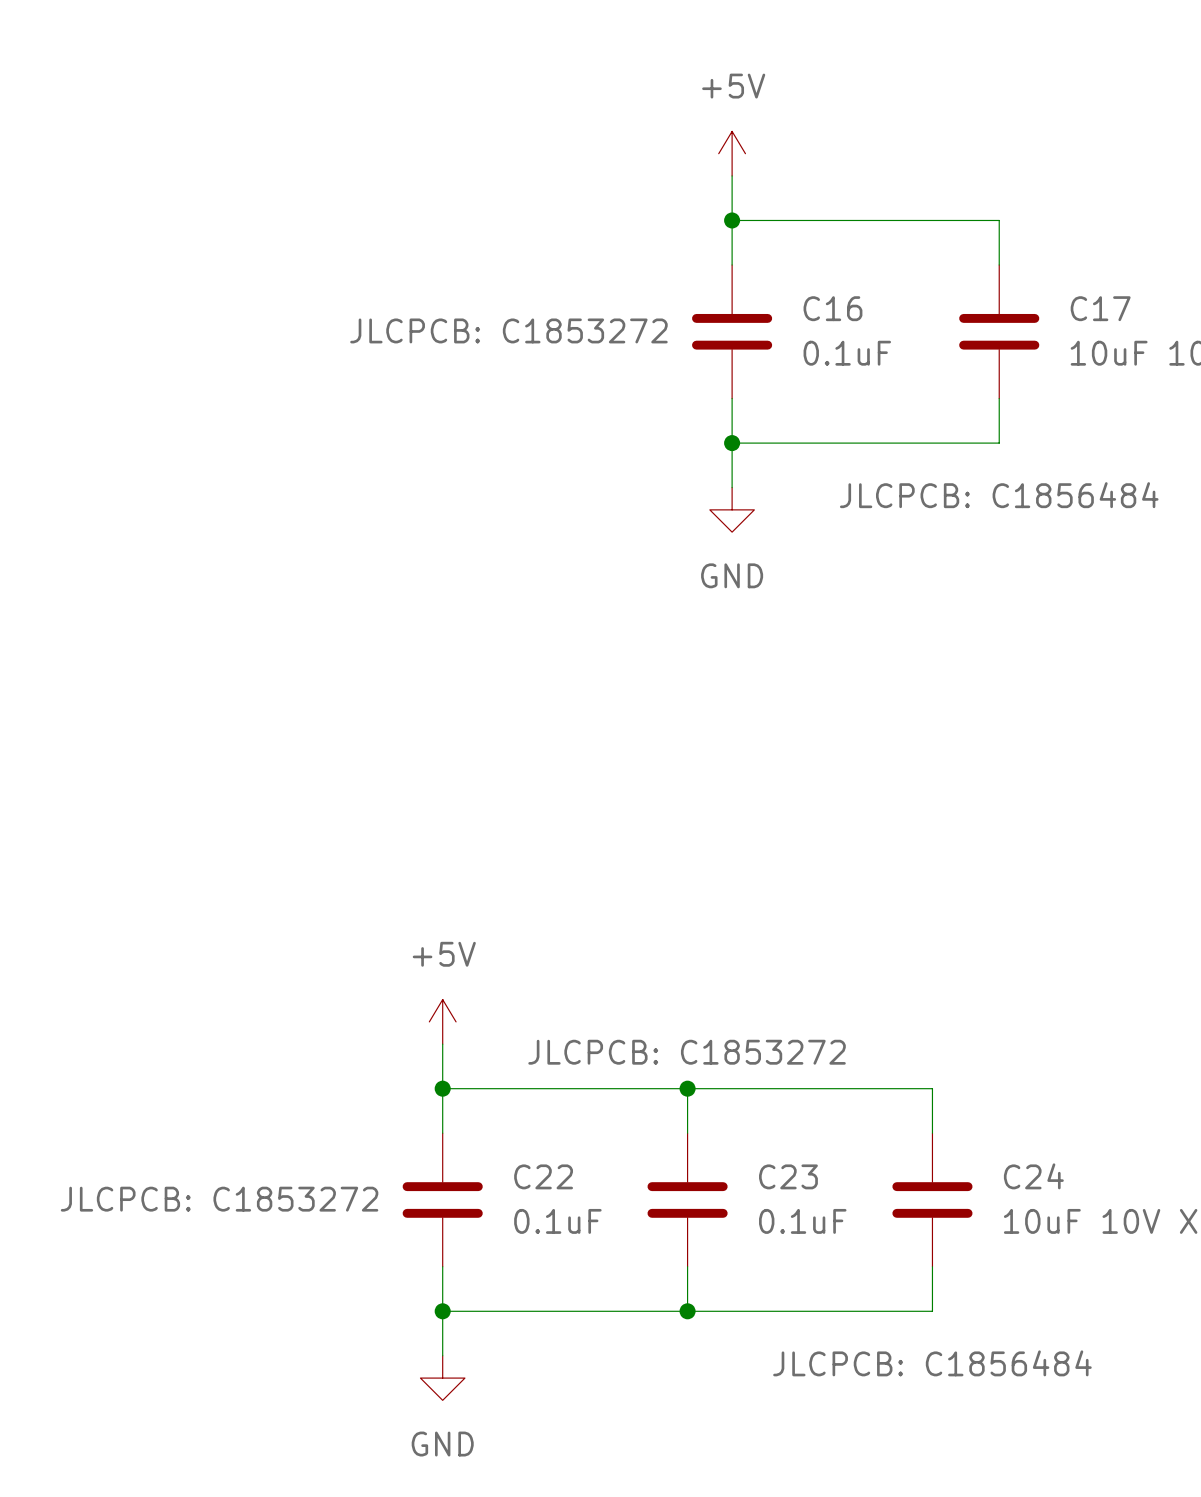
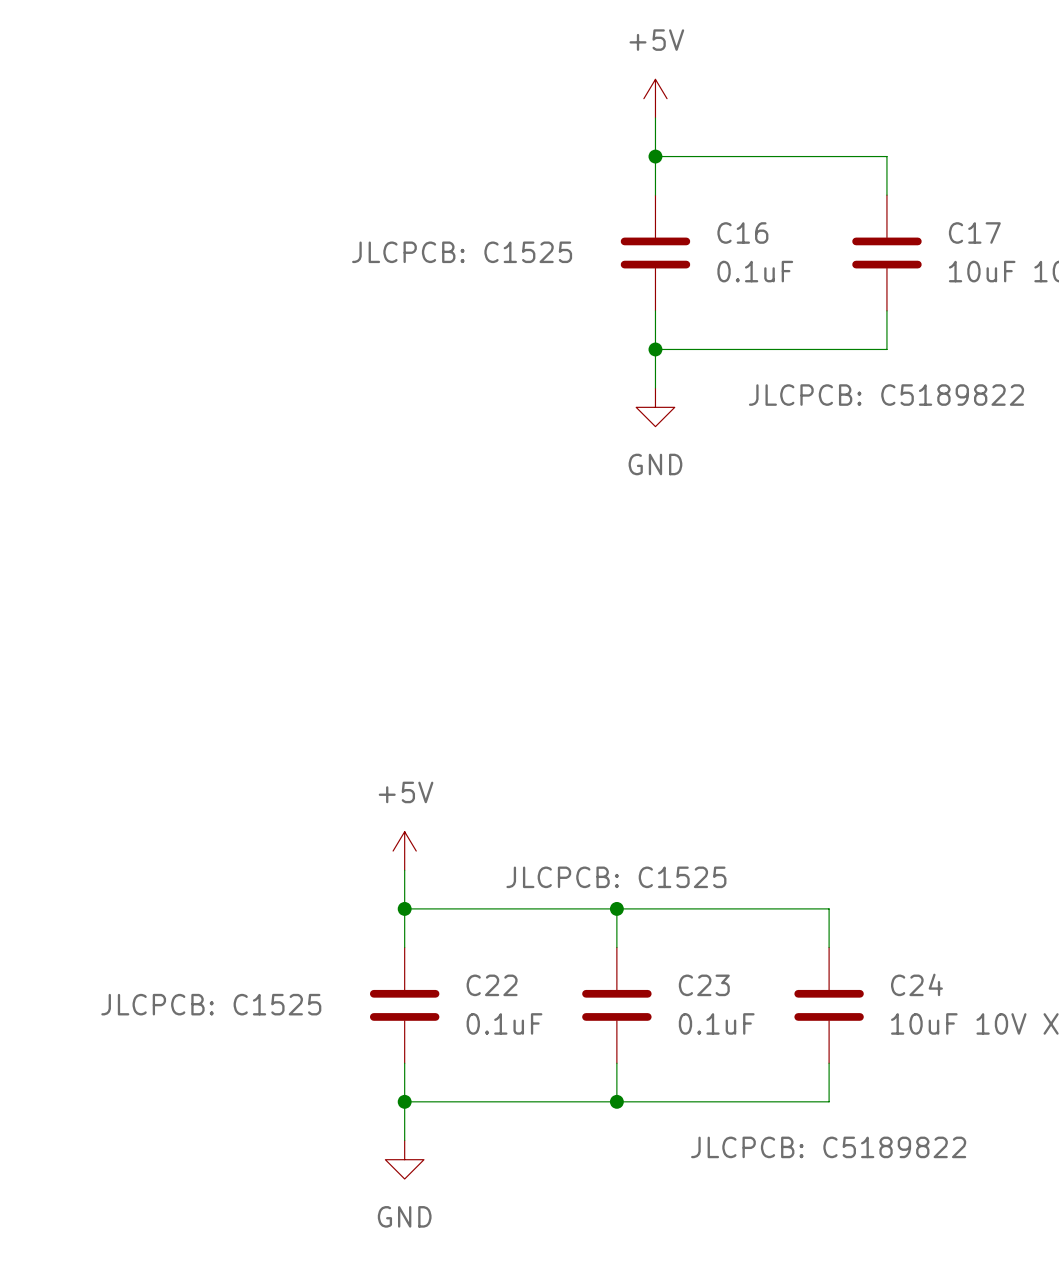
C16 text: JLCPCB: C1853272 (508, 330) -> JLCPCB: C1525 (462, 252)
C17 text: JLCPCB: C1856484 (999, 495) -> JLCPCB: C5189822 (886, 395)
C23 text: JLCPCB: C1853272 (687, 1052) -> JLCPCB: C1525 (616, 877)
C22 text: JLCPCB: C1853272 (219, 1199) -> JLCPCB: C1525 (211, 1004)
C24 text: JLCPCB: C1856484 (932, 1363) -> JLCPCB: C5189822 (828, 1147)

